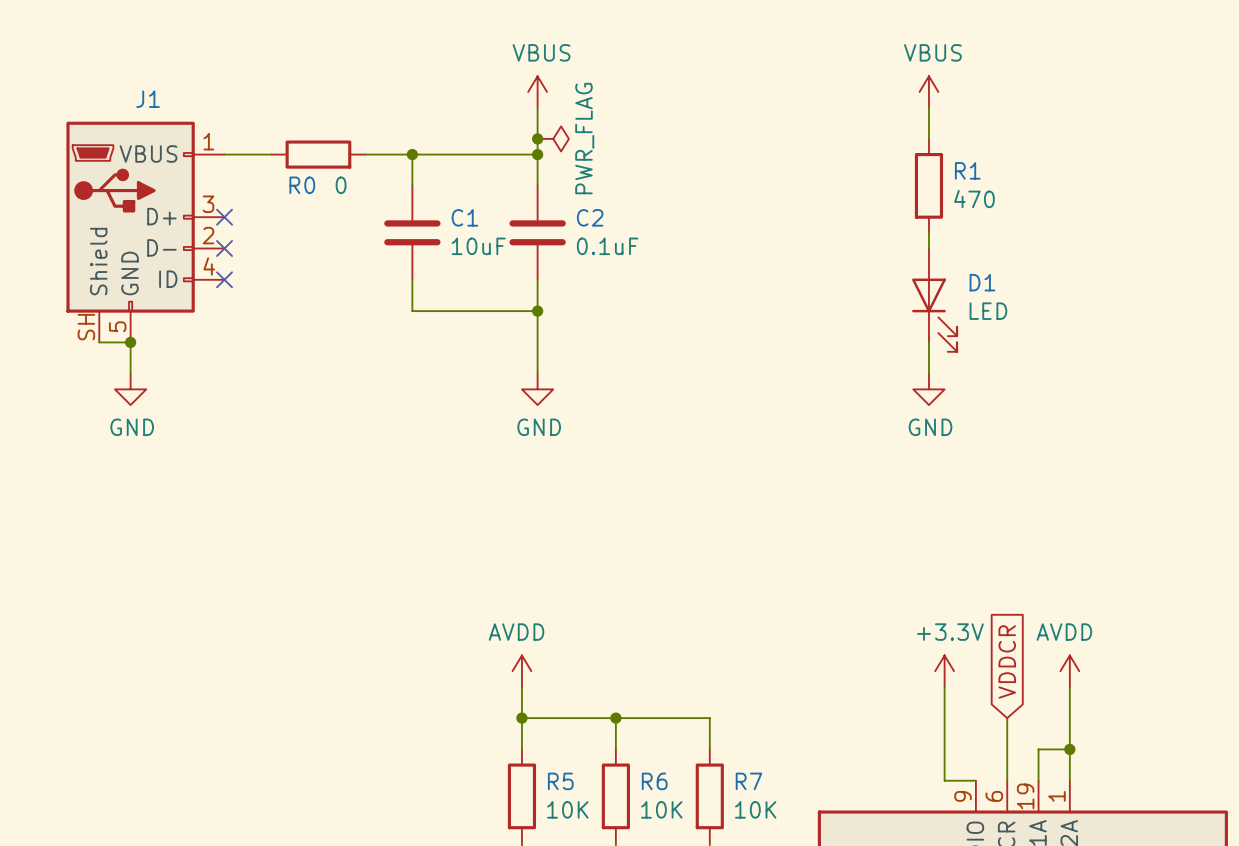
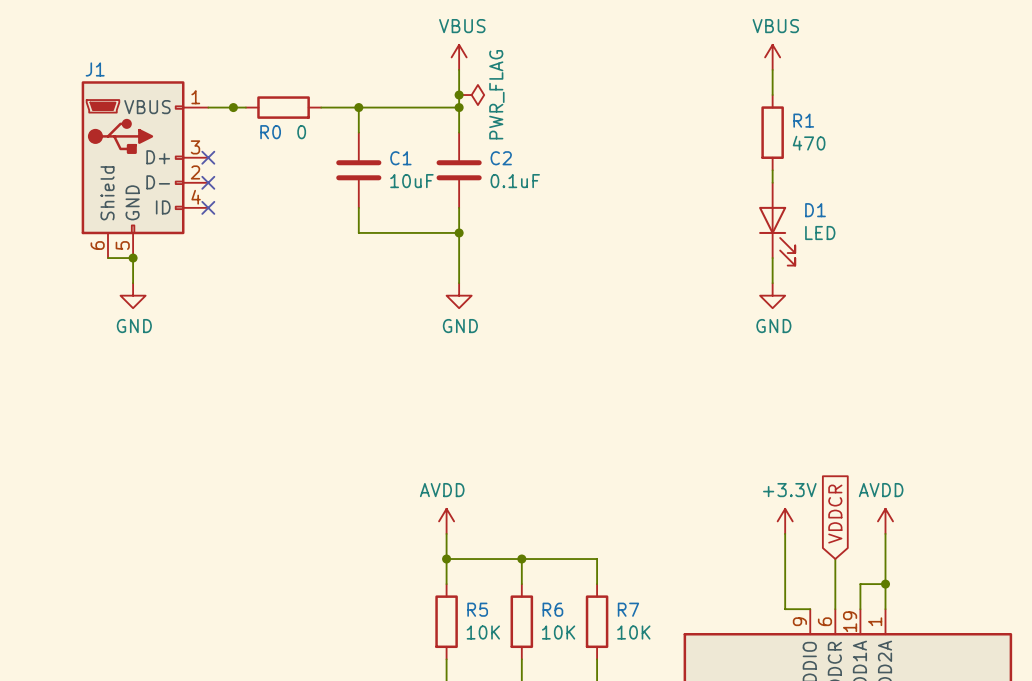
J1 name position: J1 (148, 99) -> J1 (95, 69)
junction: none -> (233, 107)
J1 pin number: SH (86, 327) -> 6 (97, 245)

